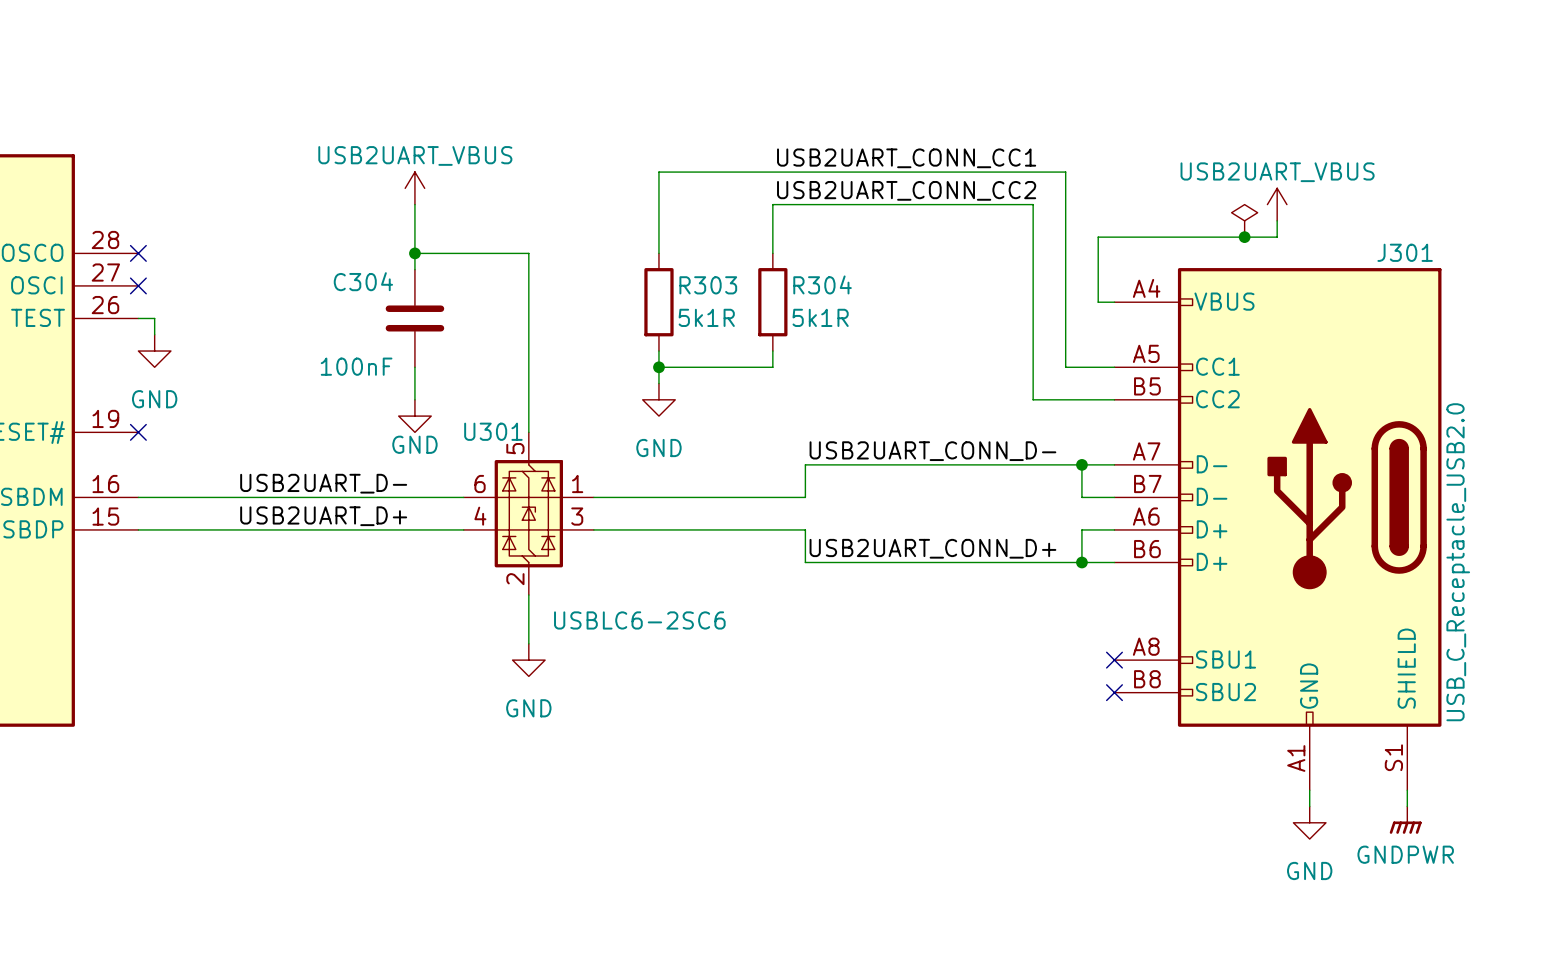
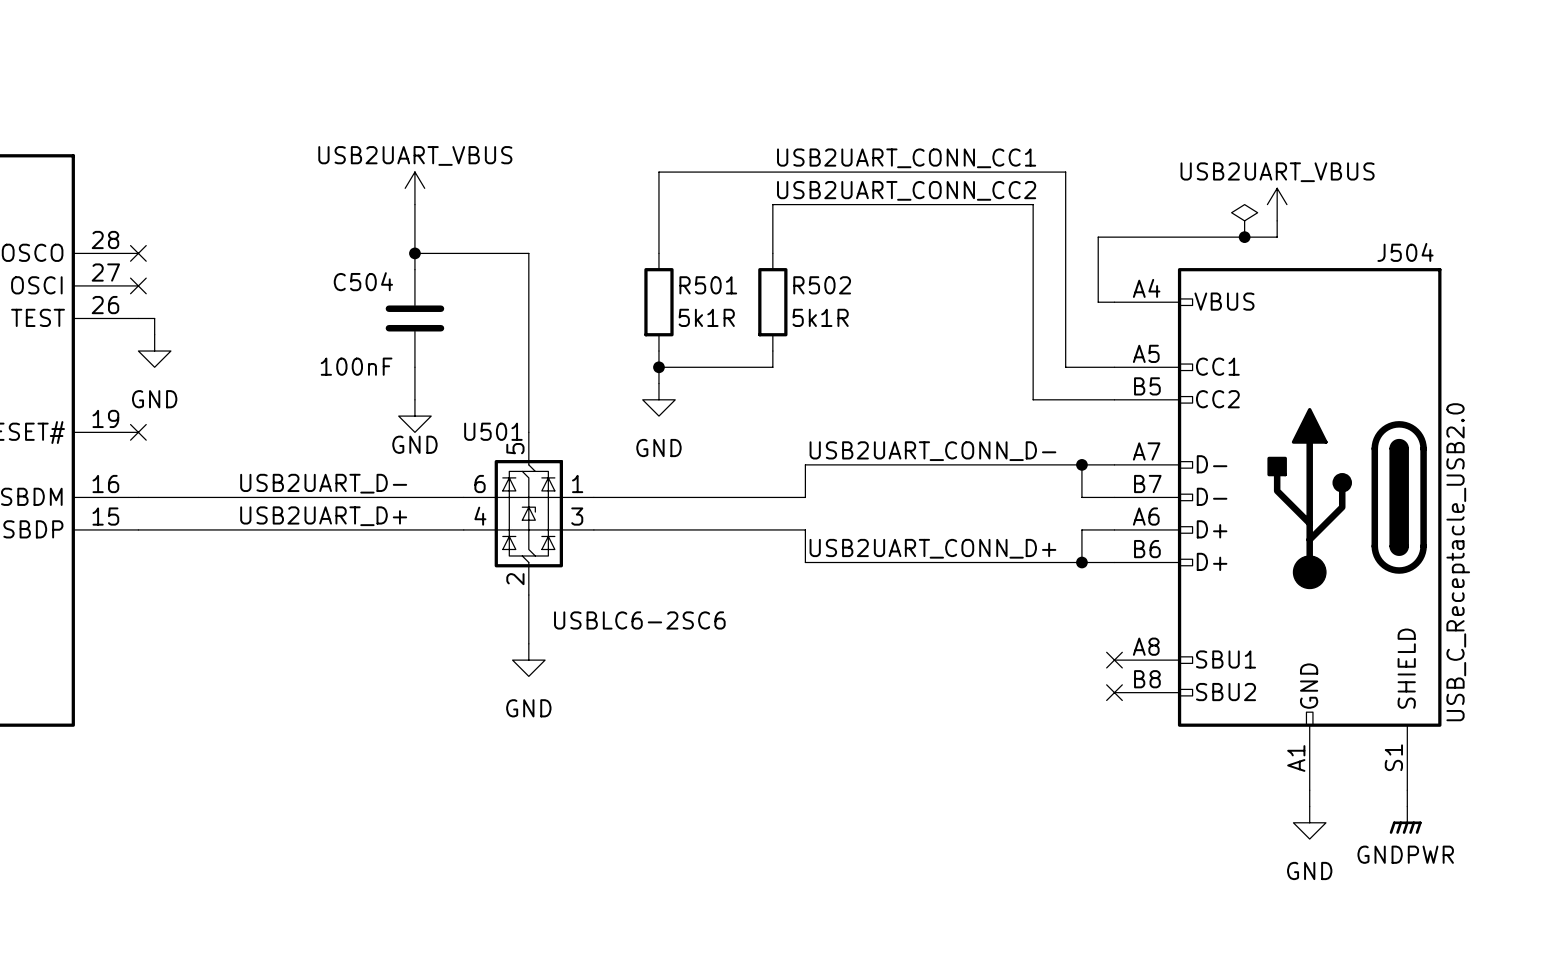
J301 name: J301 (1405, 252) -> J504 (1405, 252)
C304 name: C304 (363, 281) -> C504 (363, 281)
R304 name: R304 (822, 284) -> R502 (822, 285)
R303 name: R303 (708, 285) -> R501 (708, 285)
U301 name: U301 (493, 431) -> U501 (493, 431)

